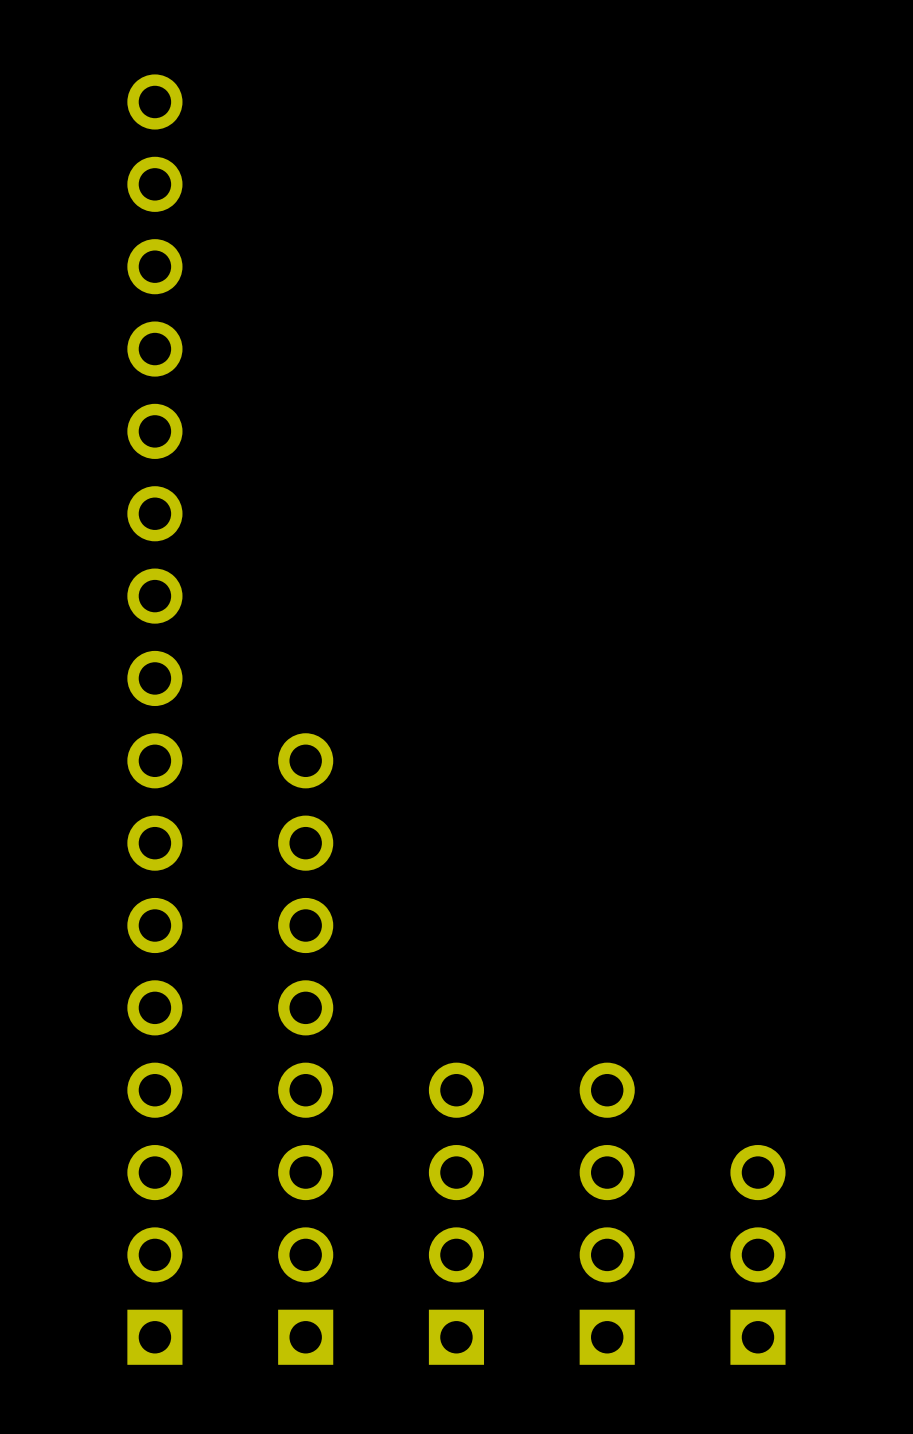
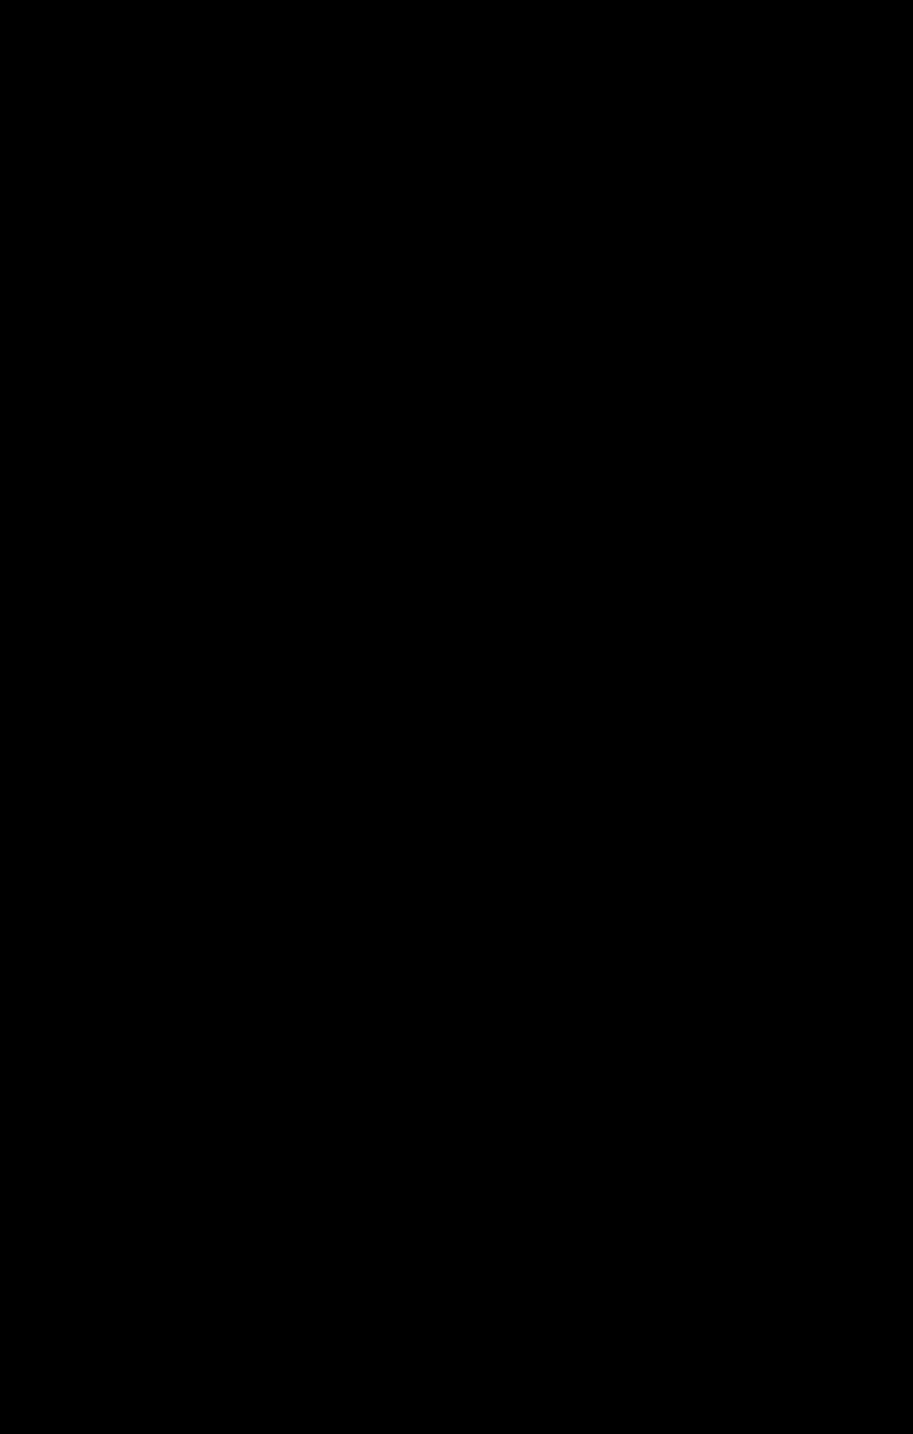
part: (154, 719) -> none
part: (305, 1049) -> none
part: (456, 1213) -> none
part: (607, 1213) -> none
part: (757, 1254) -> none

